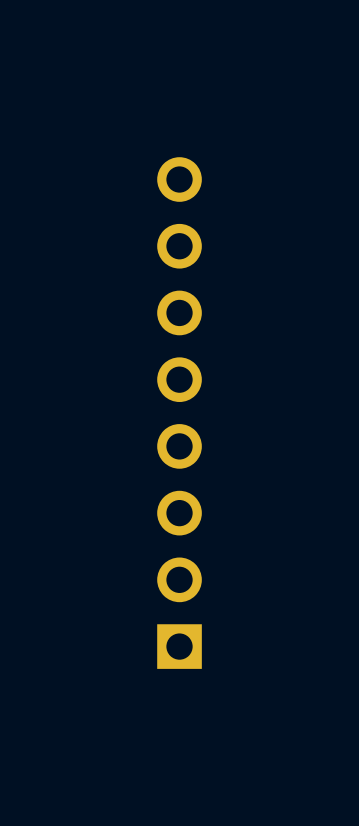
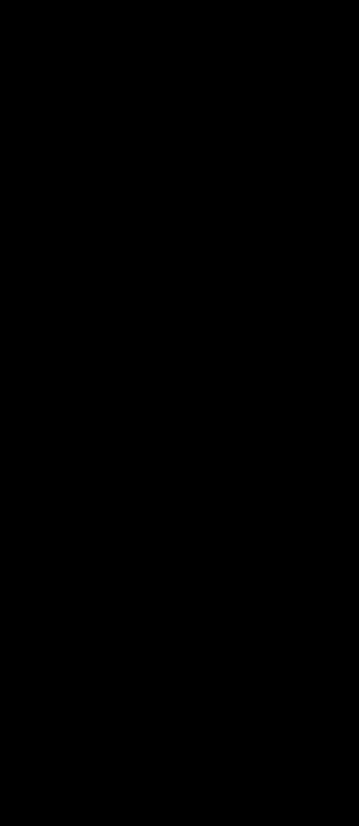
part: (179, 413) -> none

